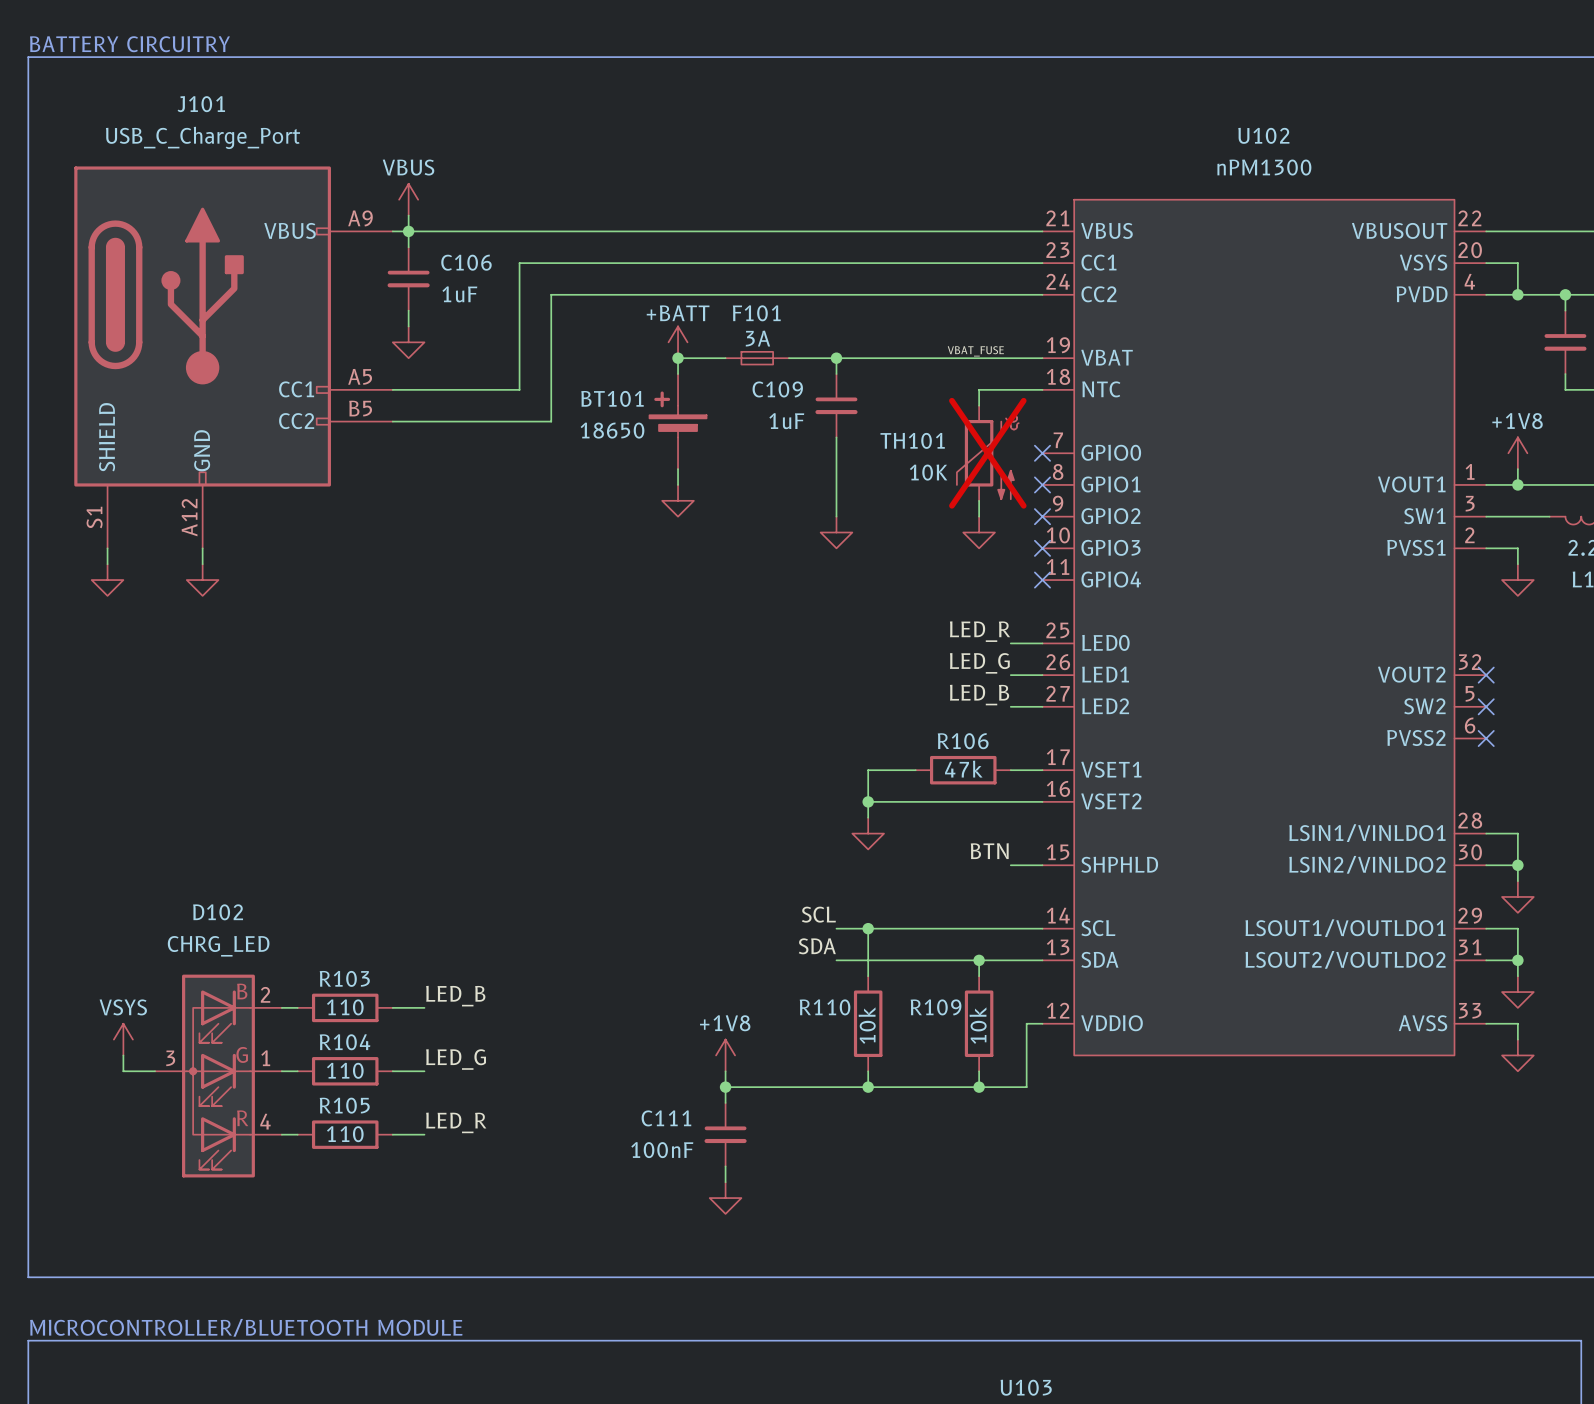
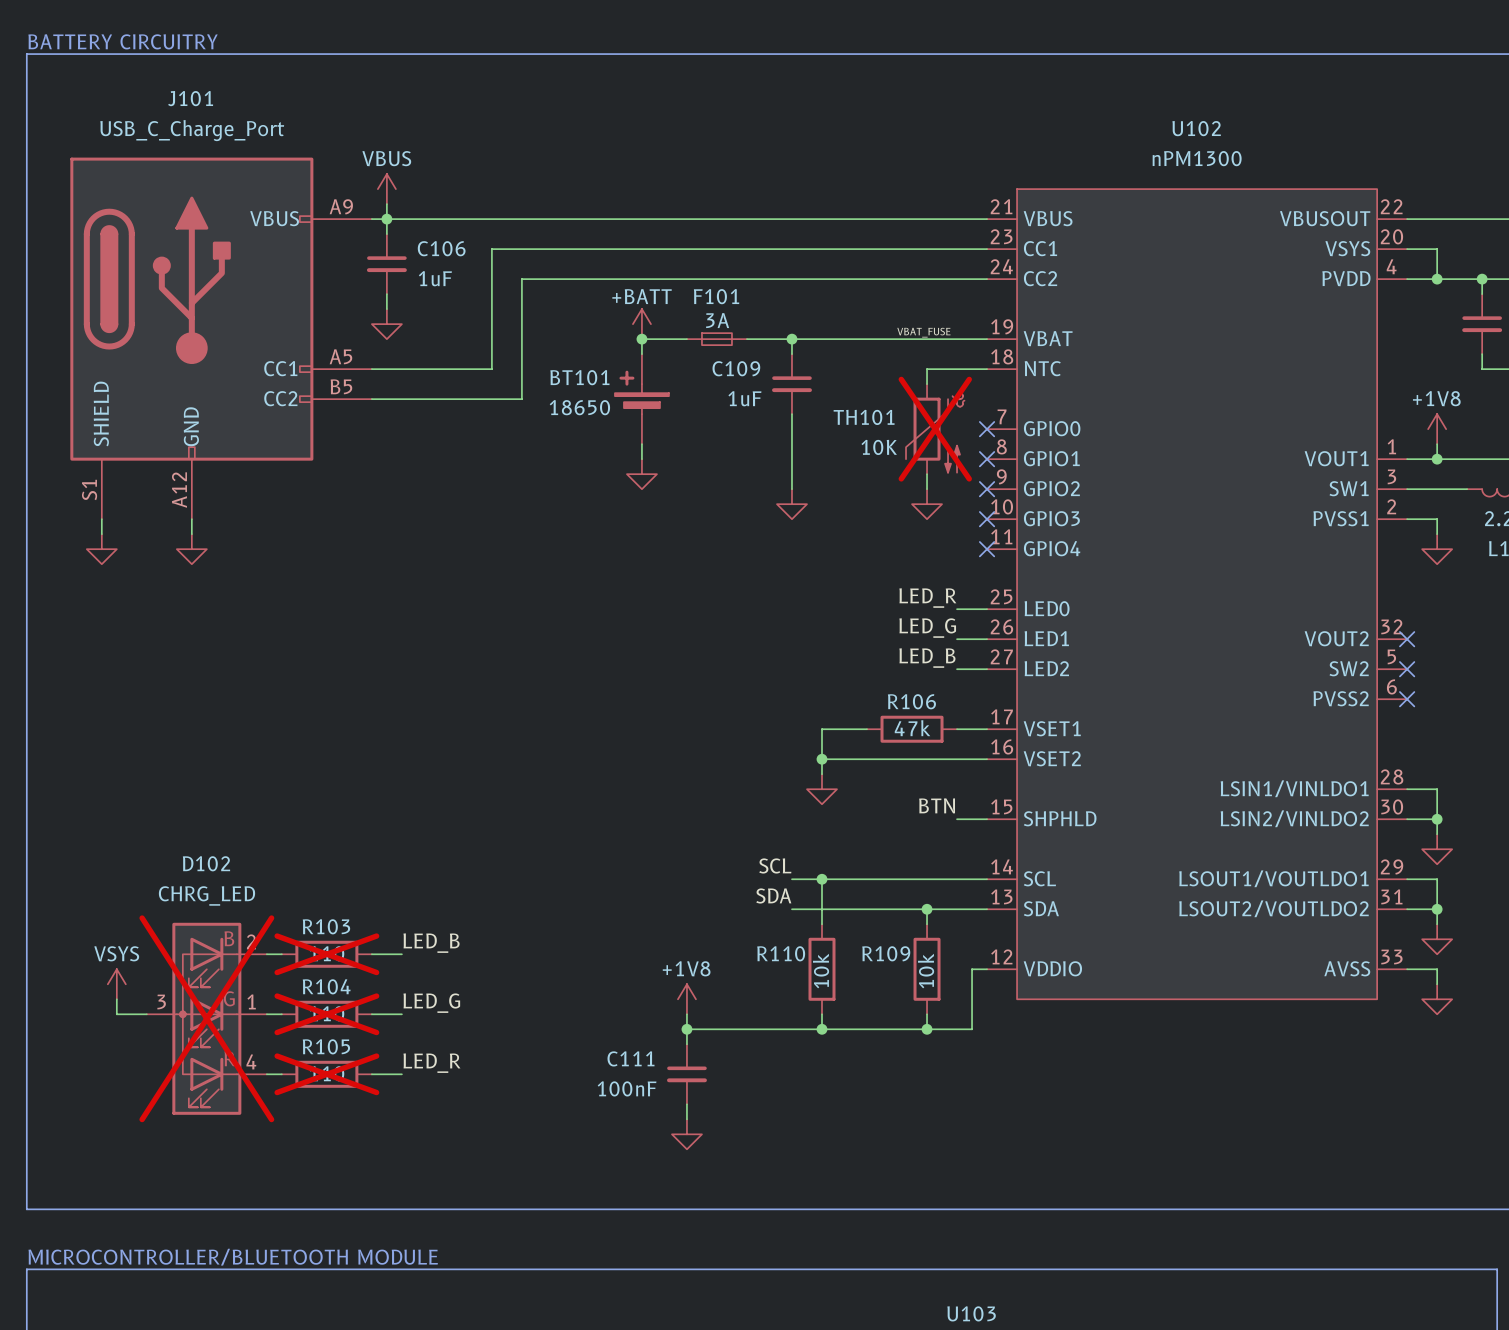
R103 do-not-place cross: none -> (326, 954)
R104 do-not-place cross: none -> (326, 1014)
D102 do-not-place cross: none -> (206, 1018)
R105 do-not-place cross: none -> (326, 1074)

